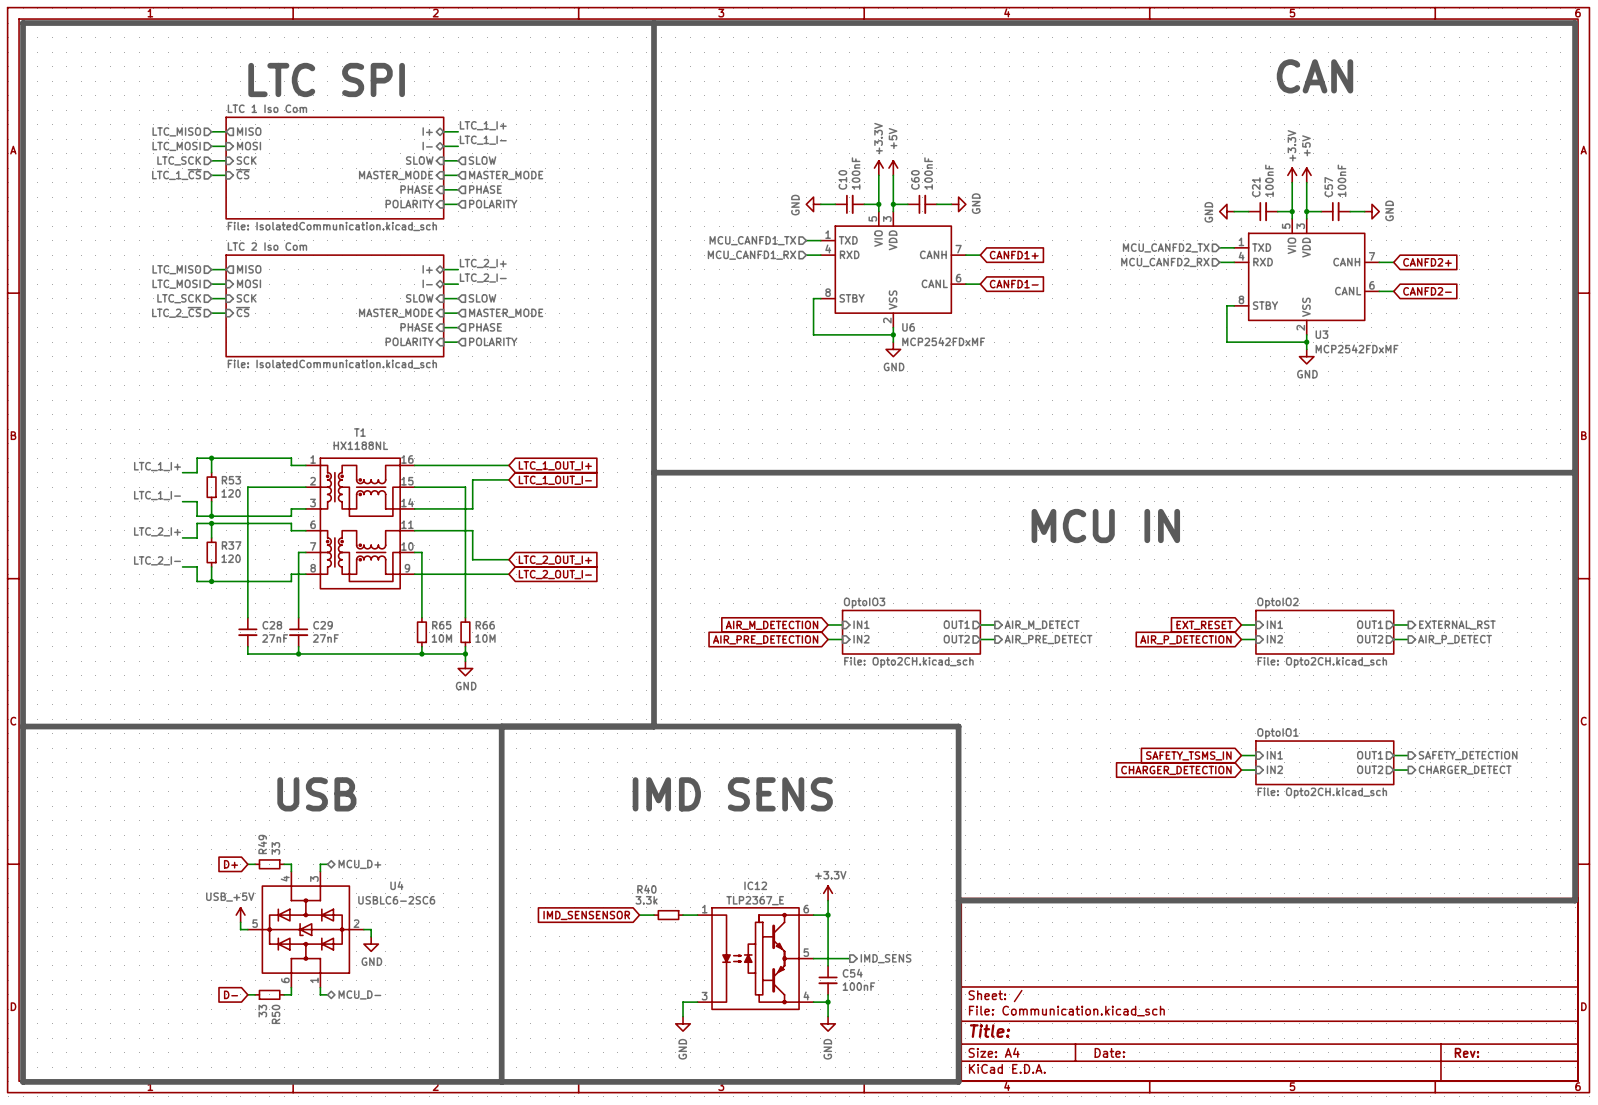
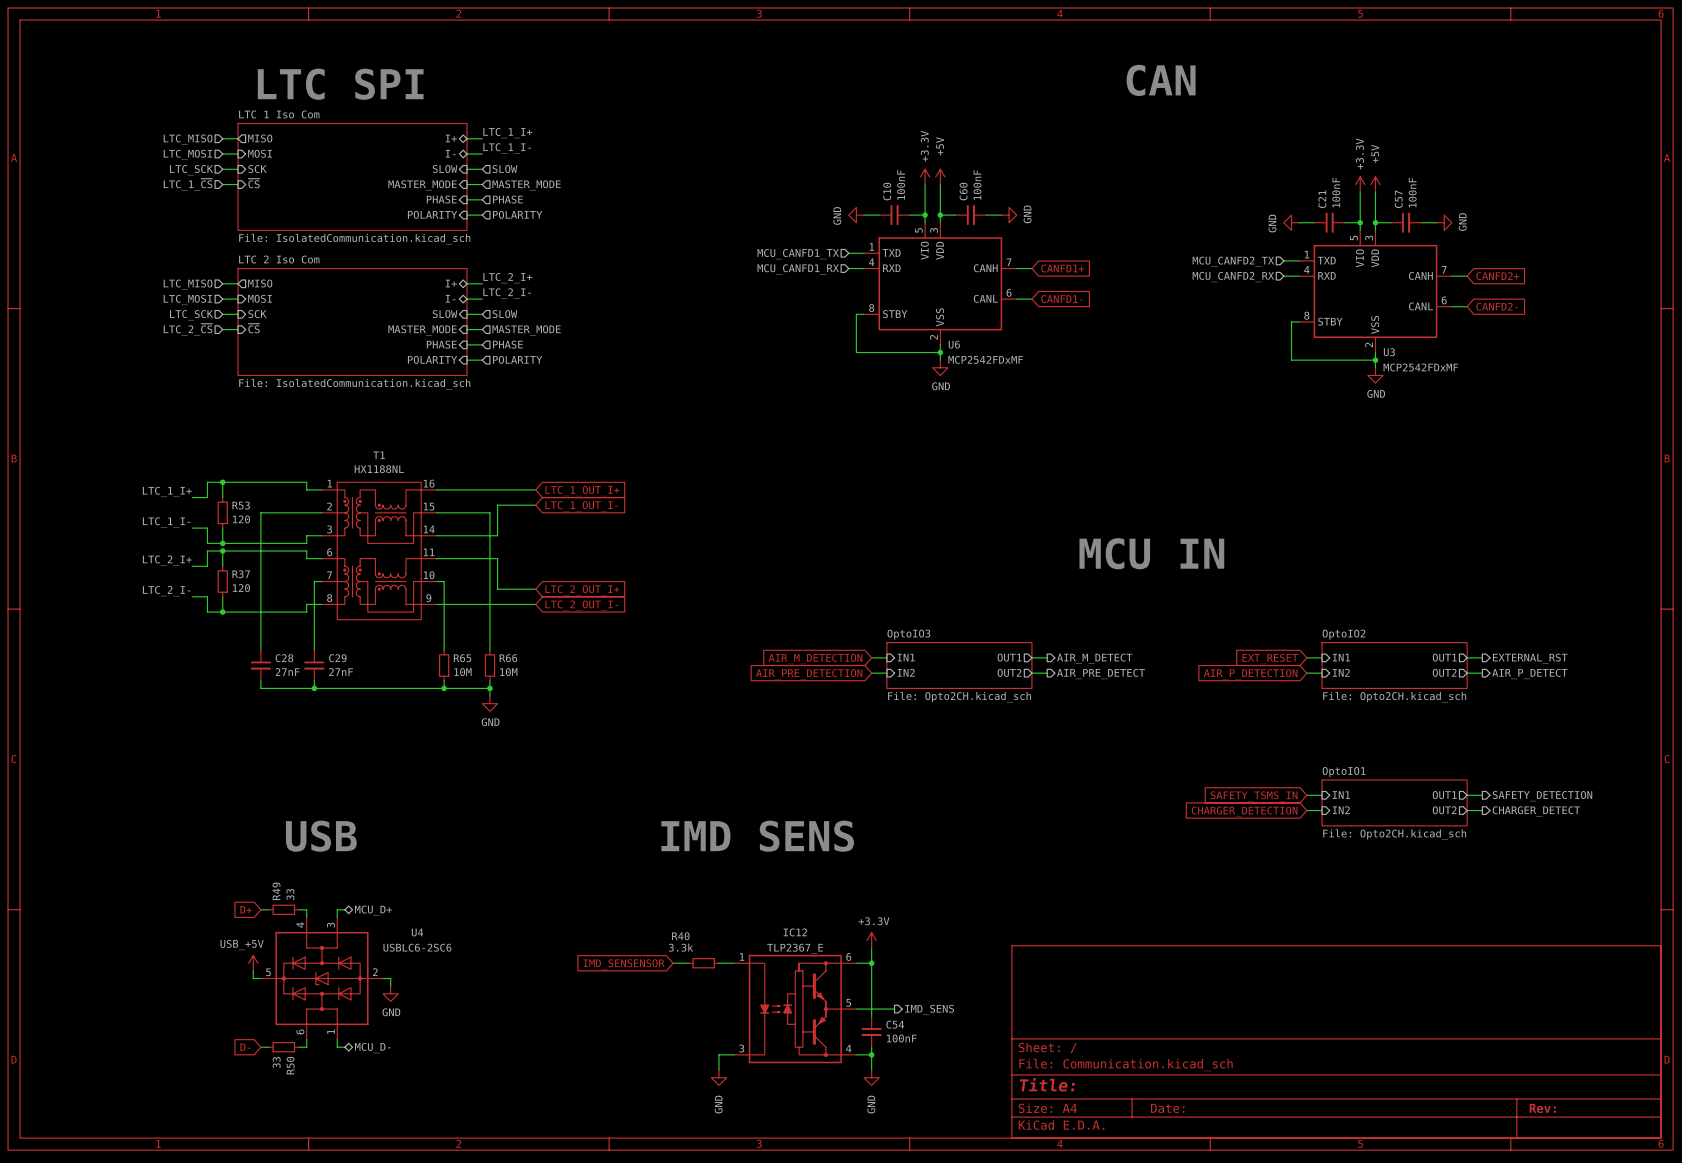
line: (654, 23) (654, 726) -> none
text: none -> CAN (1161, 80)
text: CAN (1315, 76) -> none
line: (654, 472) (1575, 472) -> none
line: (23, 726) (958, 726) (958, 1081) (23, 1081) (23, 23) (1575, 23) (1575, 900) (958, 900) -> none
line: (501, 726) (501, 1081) -> none

